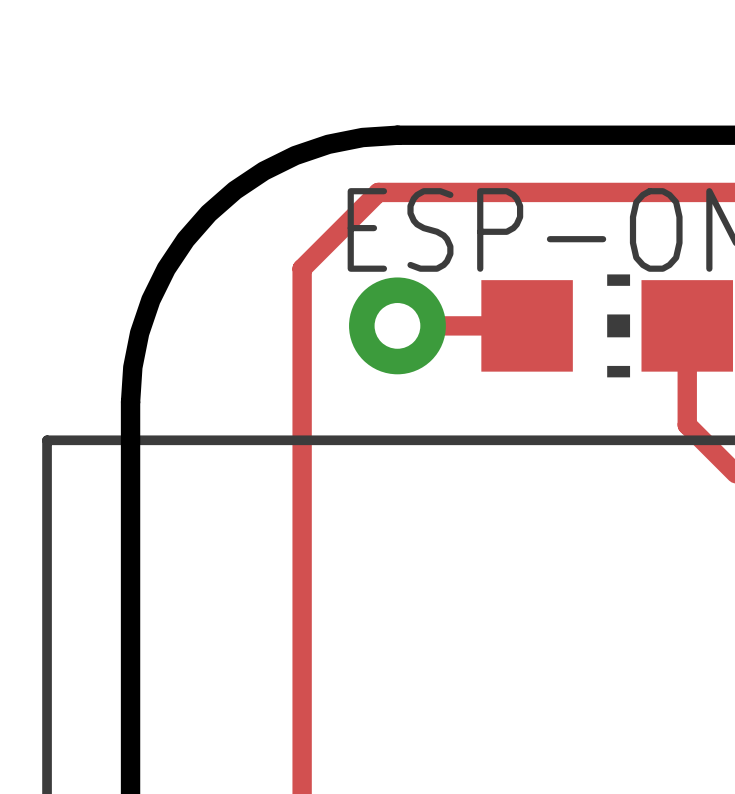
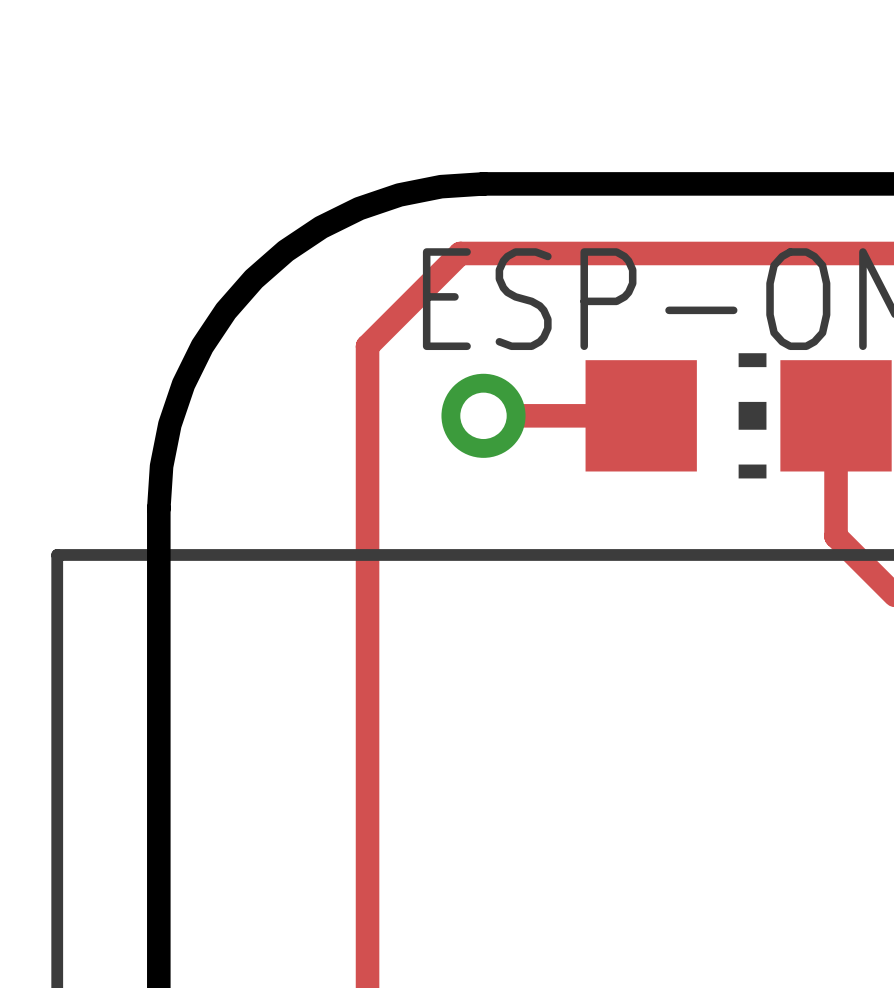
via size: [349, 277, 446, 375] -> [441, 373, 526, 458]

